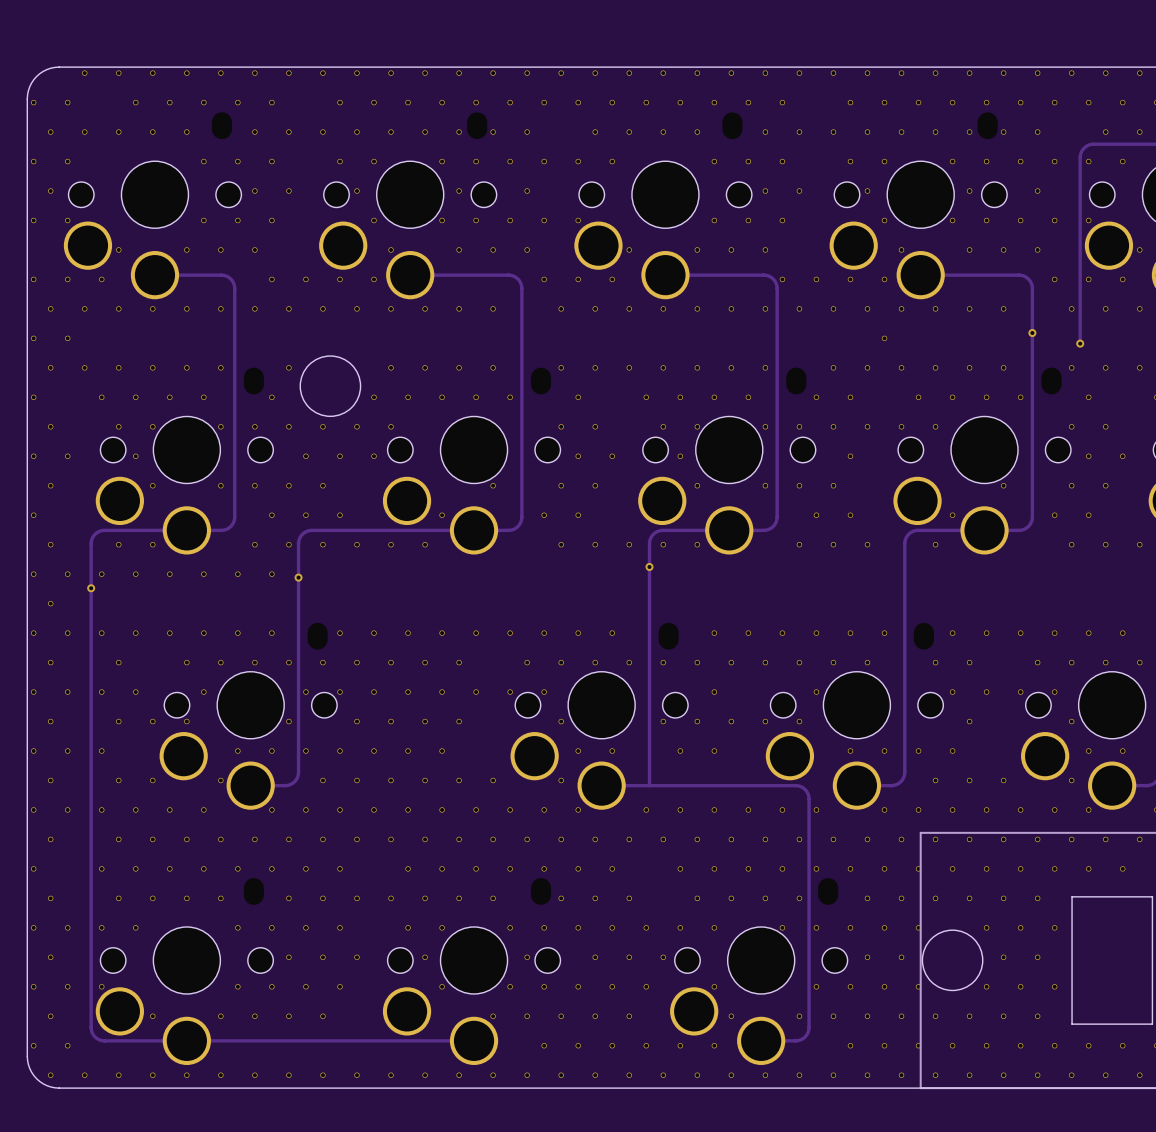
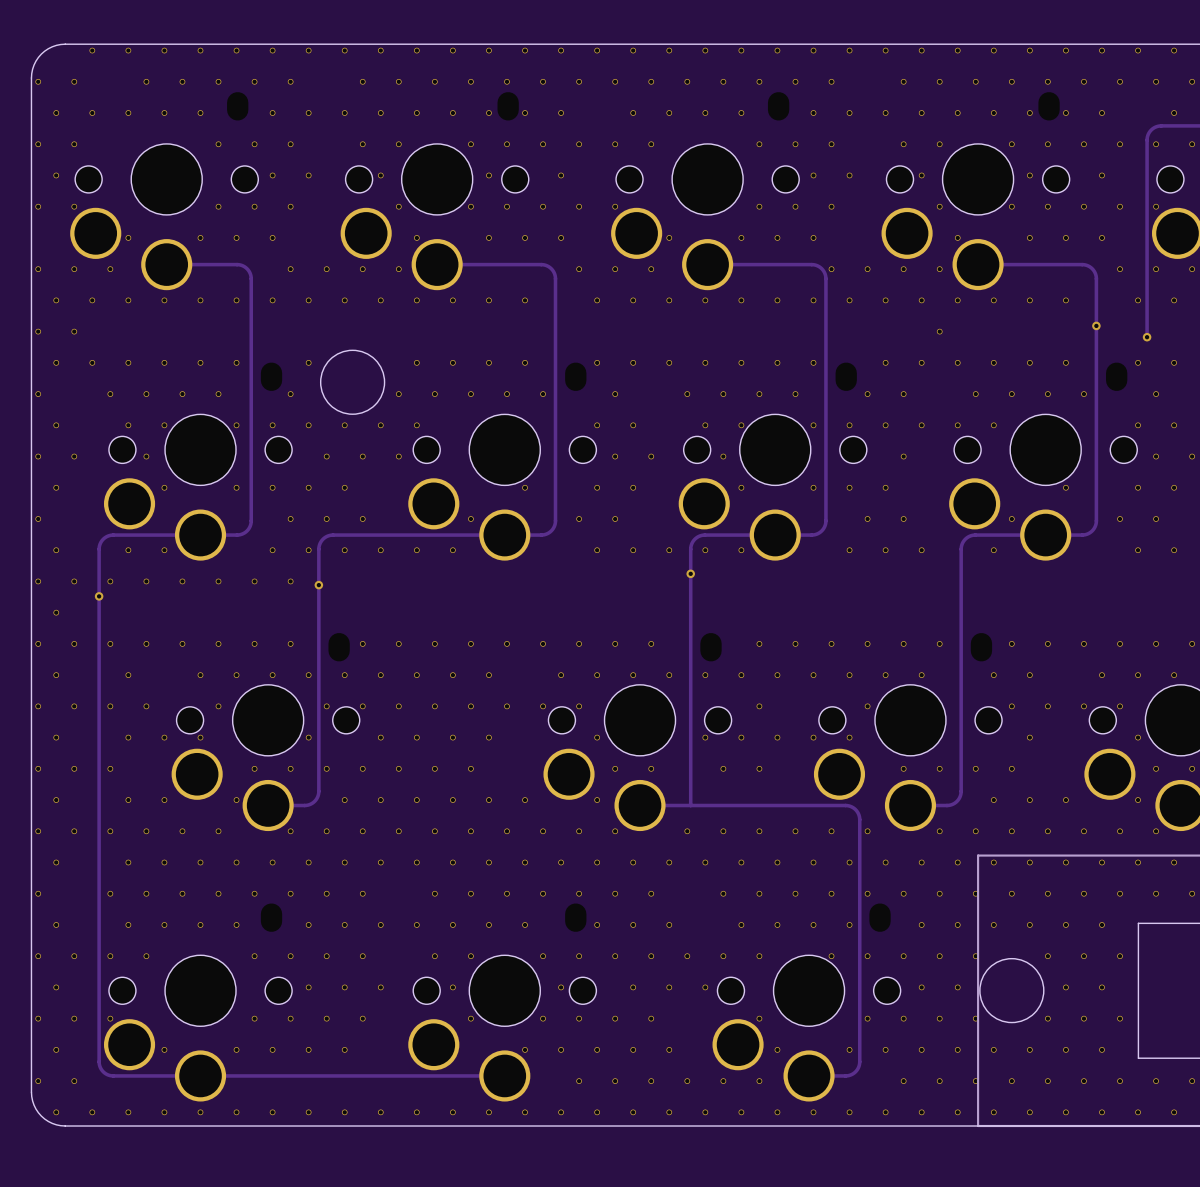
via: (646, 986) -> none

